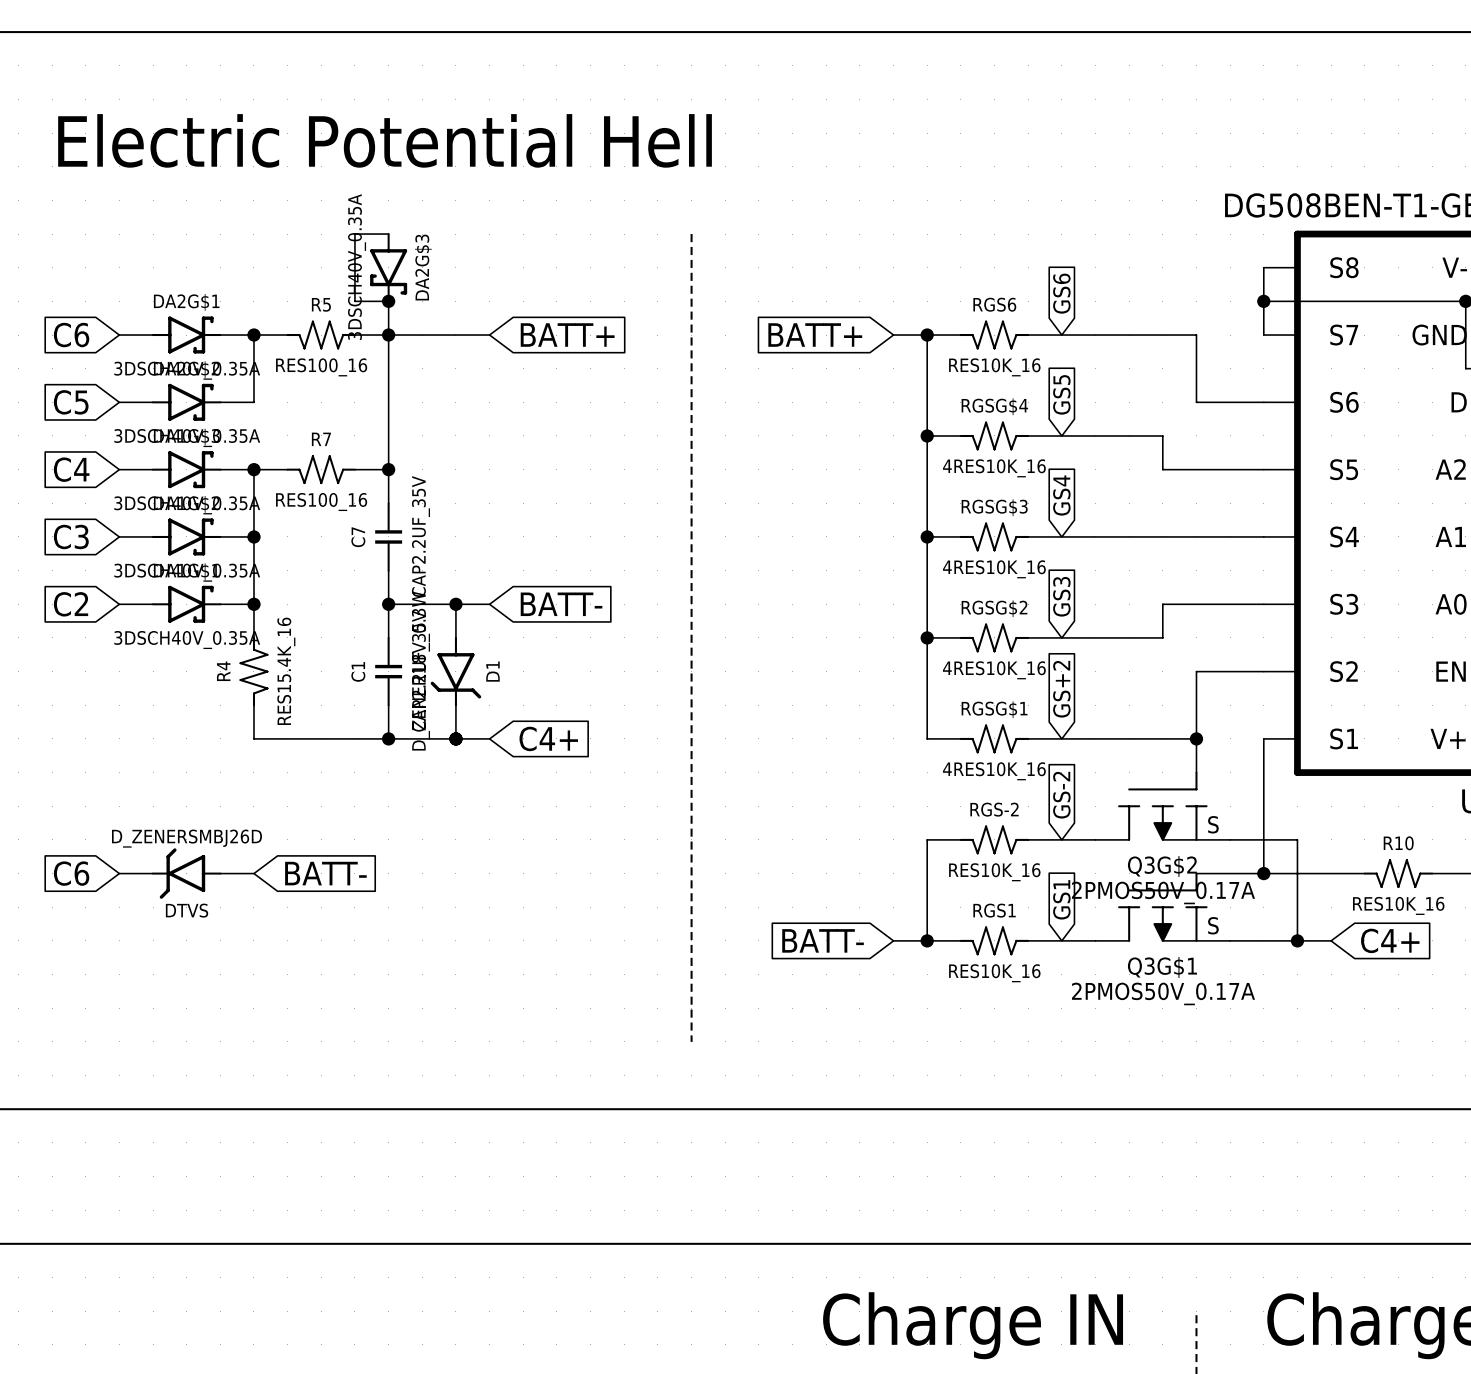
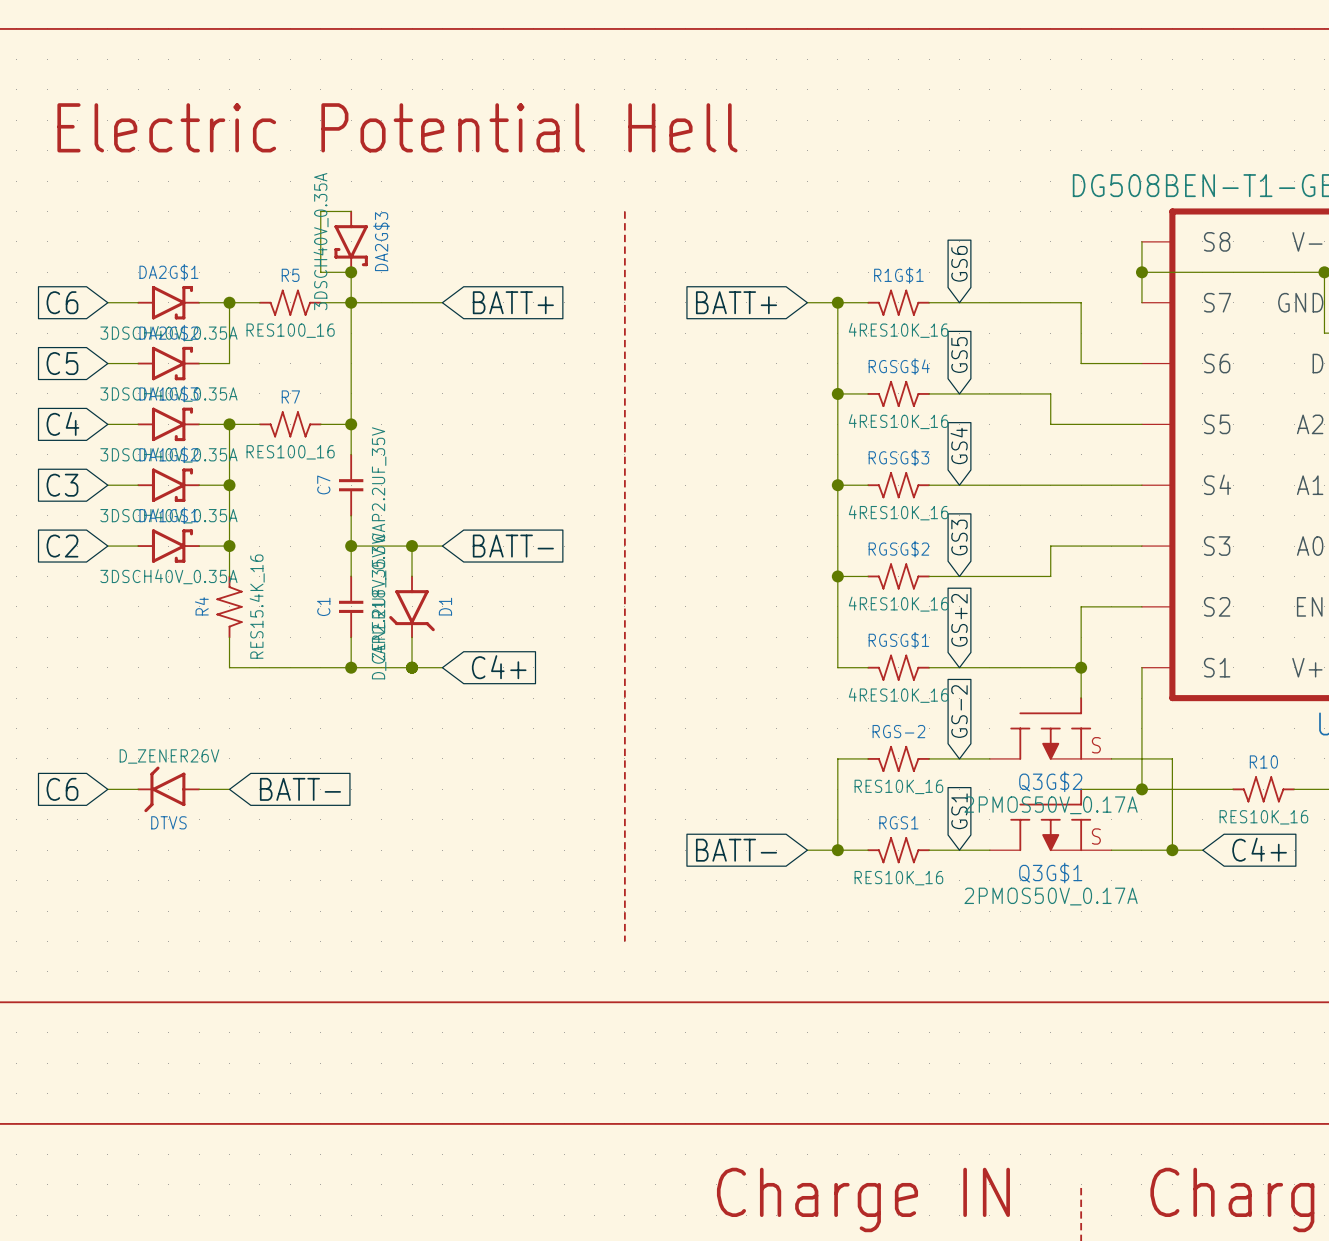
RGS6 name: RGS6 (994, 304) -> R1G$1 (898, 275)
RGS6 value: RES10K_16 (994, 367) -> 4RES10K_16 (898, 330)
DTVS value: D_ZENERSMBJ26D (187, 838) -> D_ZENER26V (169, 756)

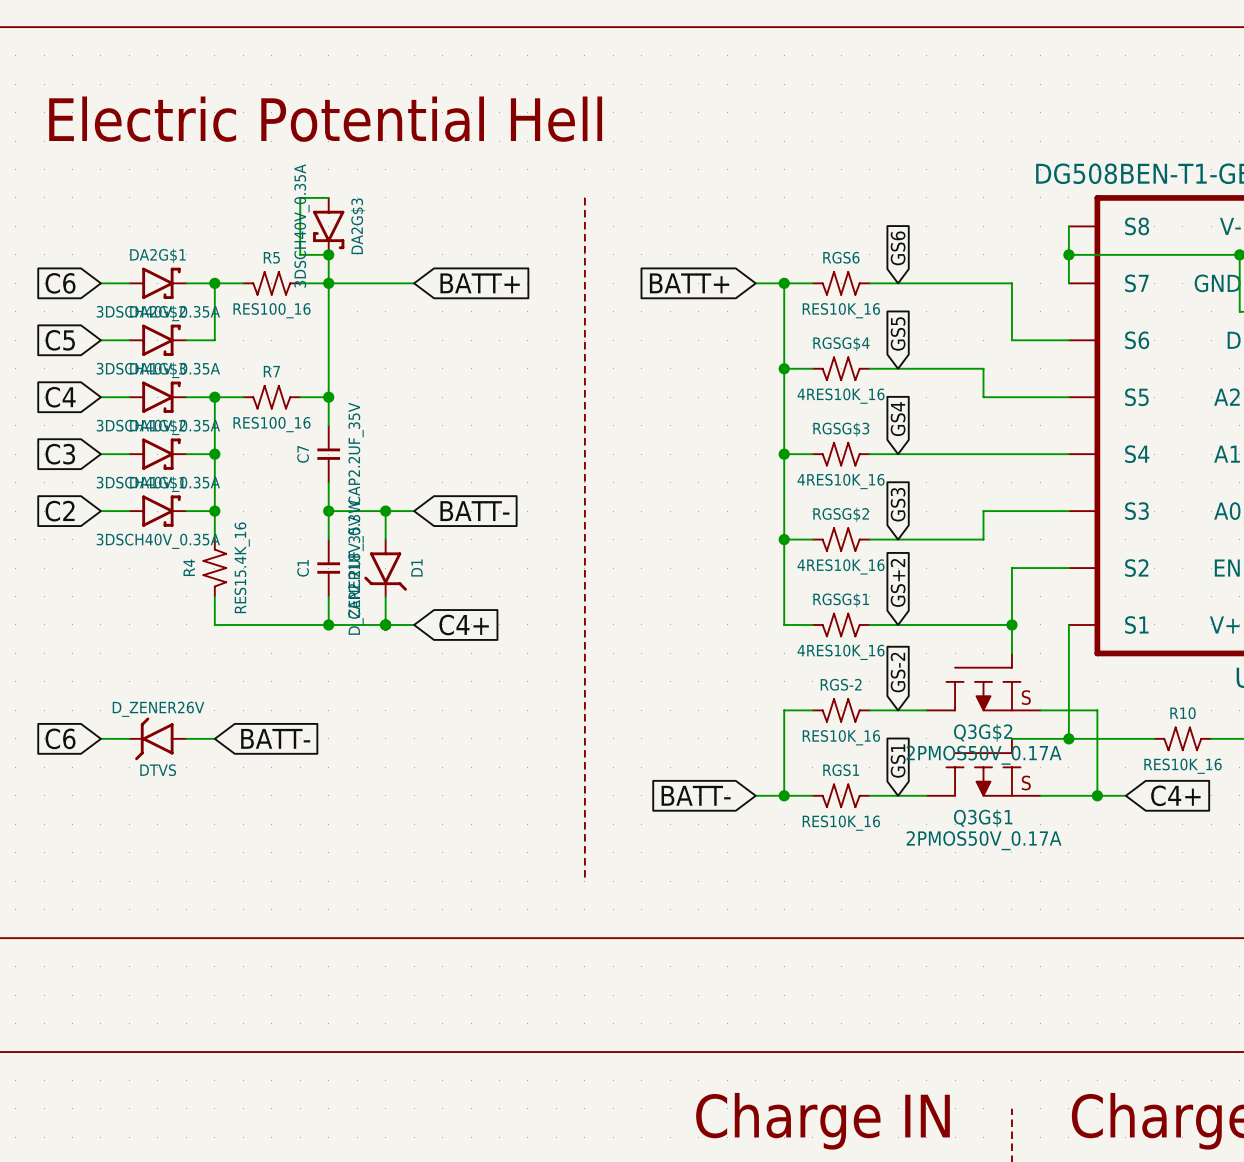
R1G$1 name: R1G$1 (898, 275) -> RGS6 (841, 257)
R1G$1 value: 4RES10K_16 (898, 330) -> RES10K_16 (841, 310)

